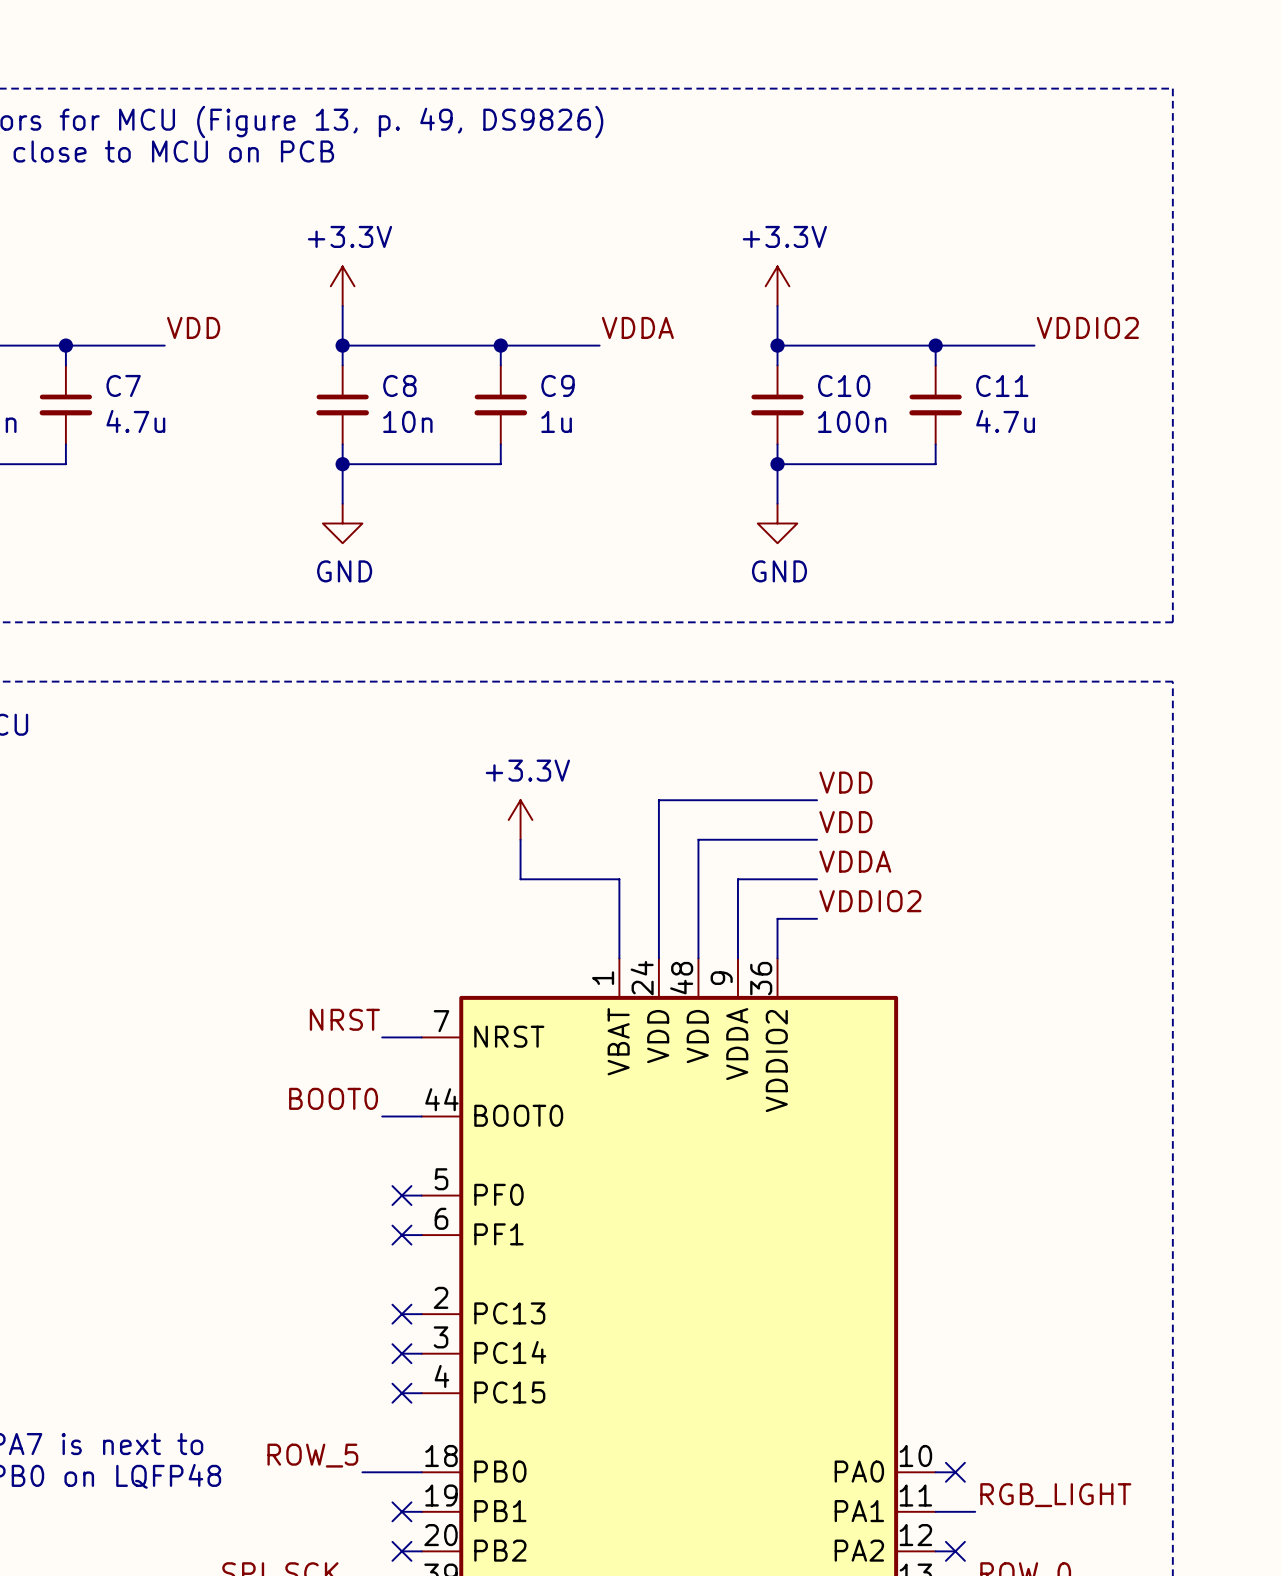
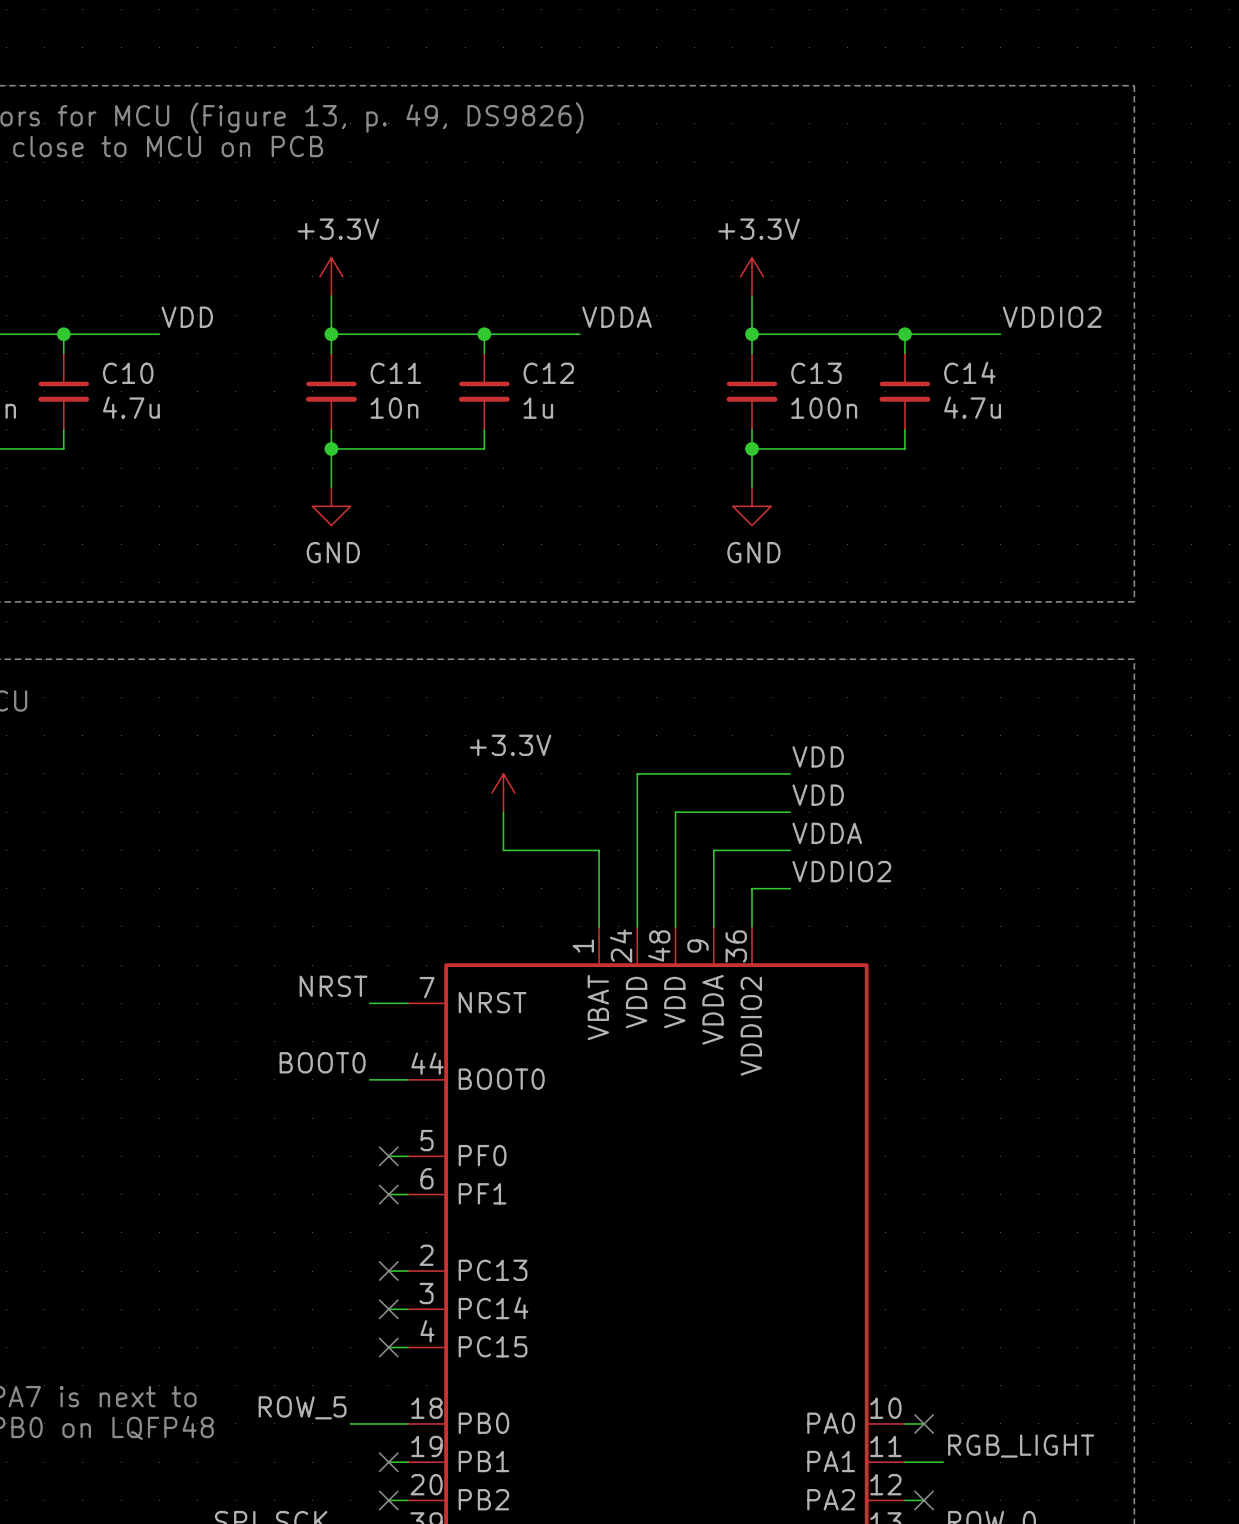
C7 name: C7 (123, 385) -> C10 (128, 373)
C8 name: C8 (399, 385) -> C11 (395, 373)
C9 name: C9 (558, 385) -> C12 (548, 373)
C10 name: C10 (844, 385) -> C13 (816, 373)
C11 name: C11 (1002, 385) -> C14 (969, 372)

